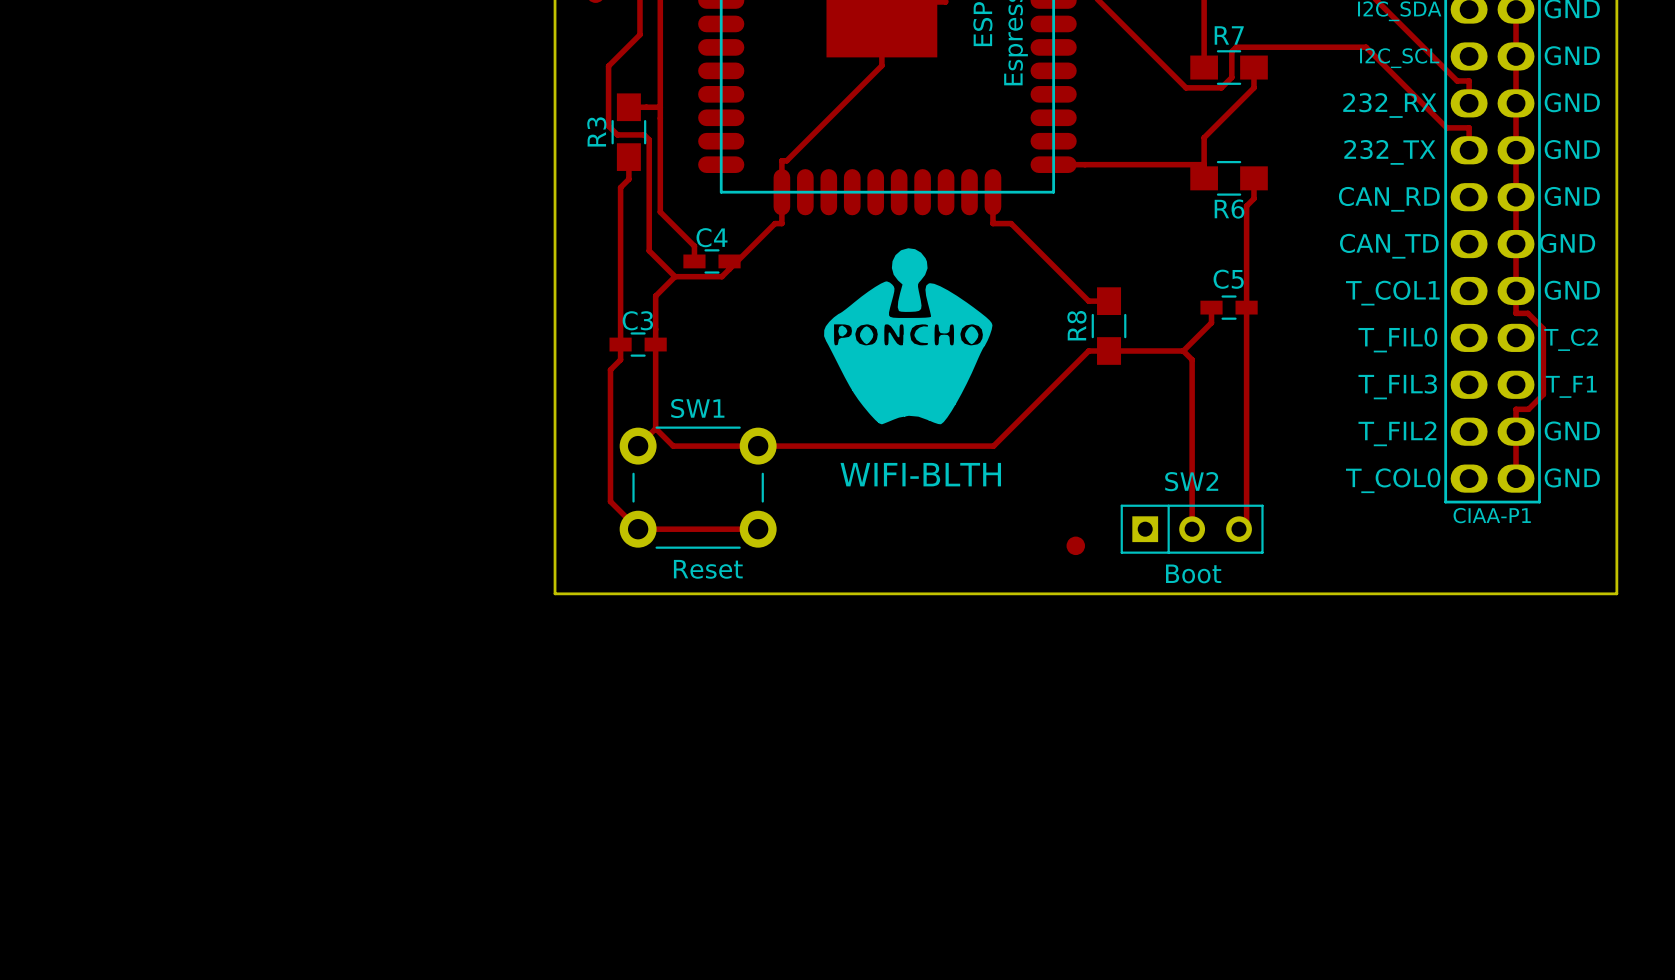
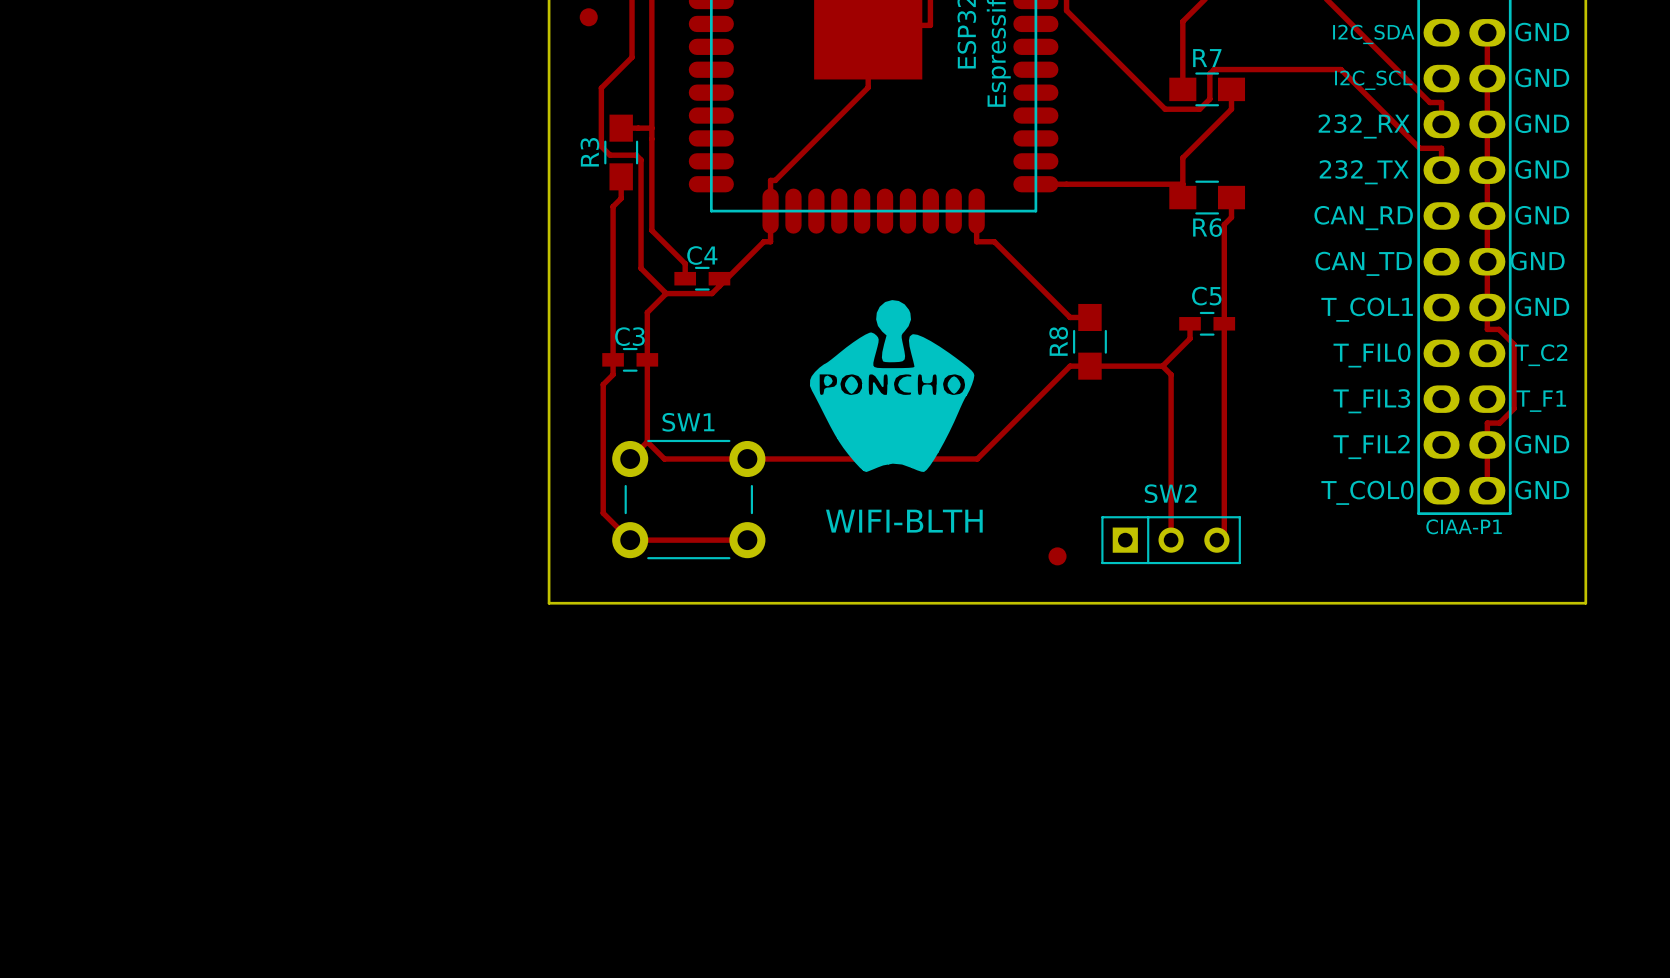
drawing position: (908, 336) -> (892, 386)
text: Reset (708, 569) -> none
text: Boot (1193, 573) -> none

